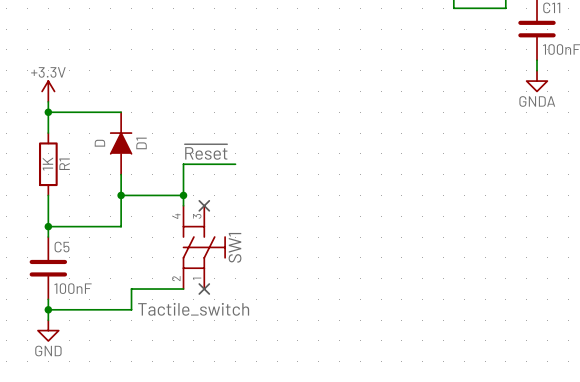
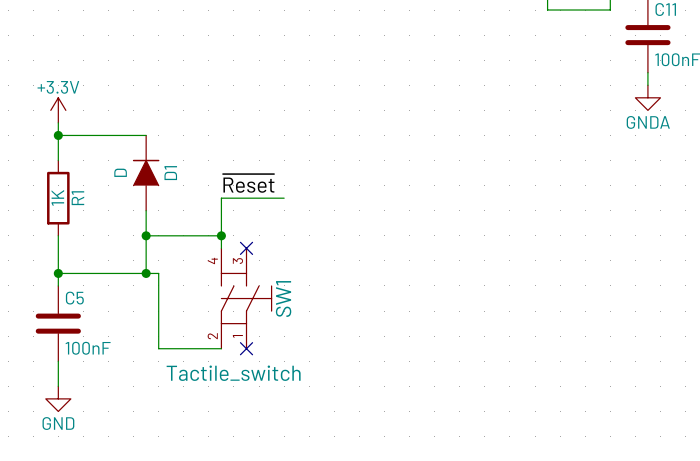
junction: none -> (146, 273)
wire: (131, 289) (131, 309) (48, 309) -> (158, 348) (158, 273) (146, 273)
junction: (48, 309) -> none

